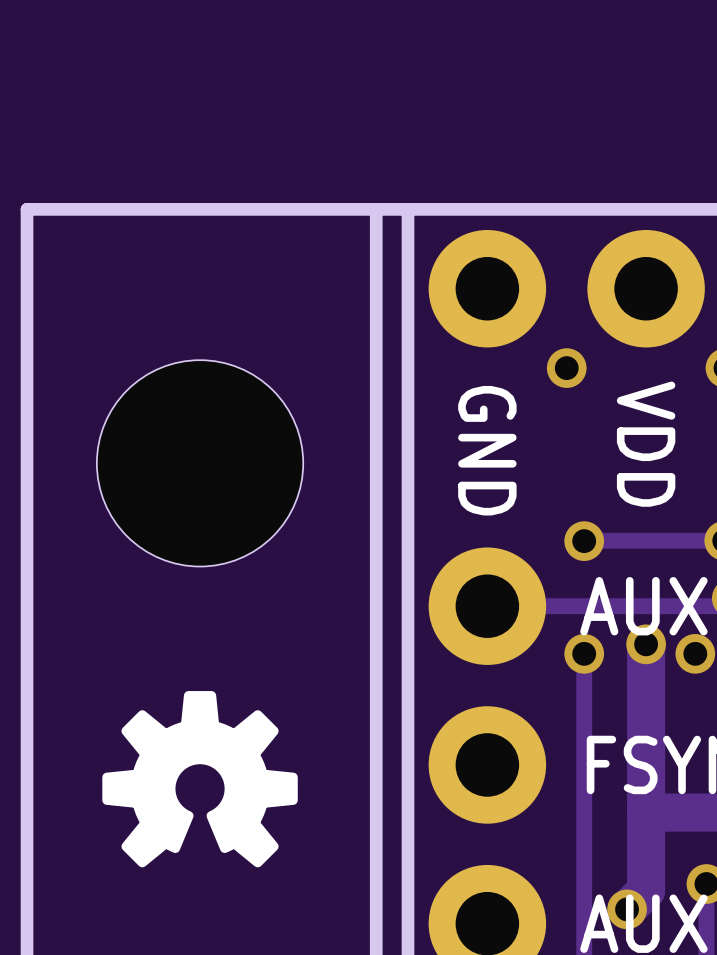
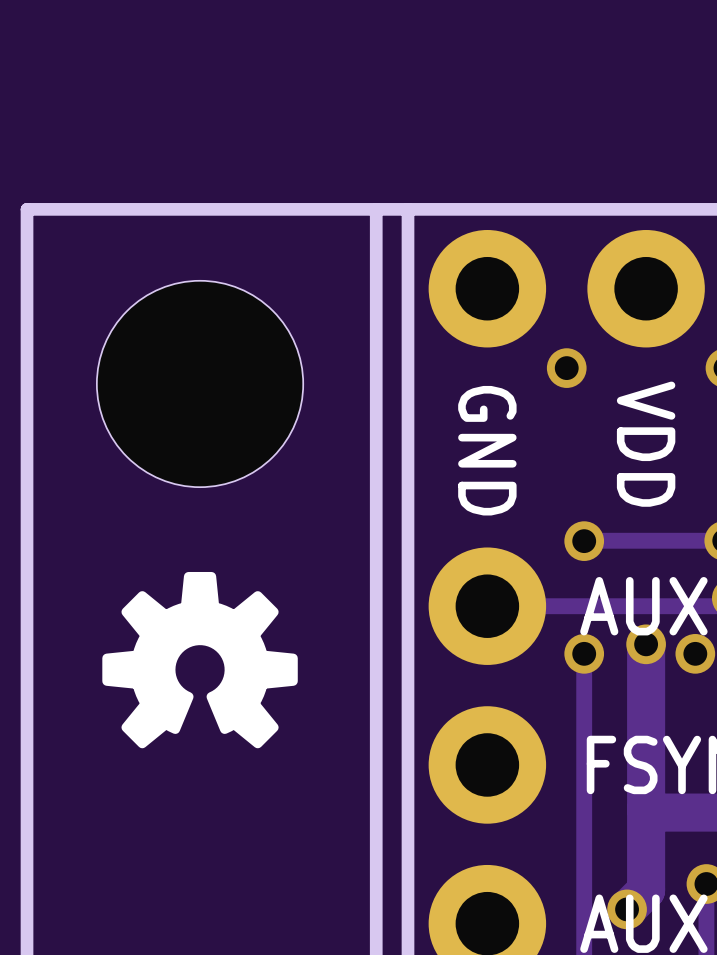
part position: (200, 463) -> (200, 383)
drawing position: (200, 779) -> (200, 660)

